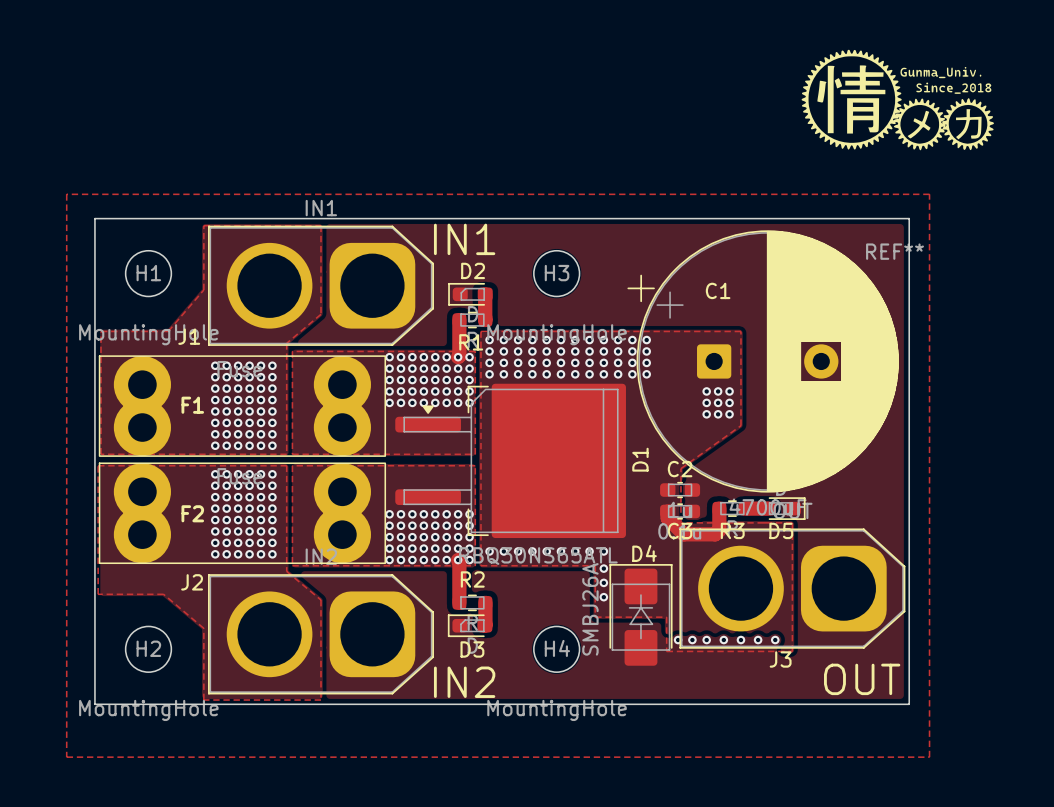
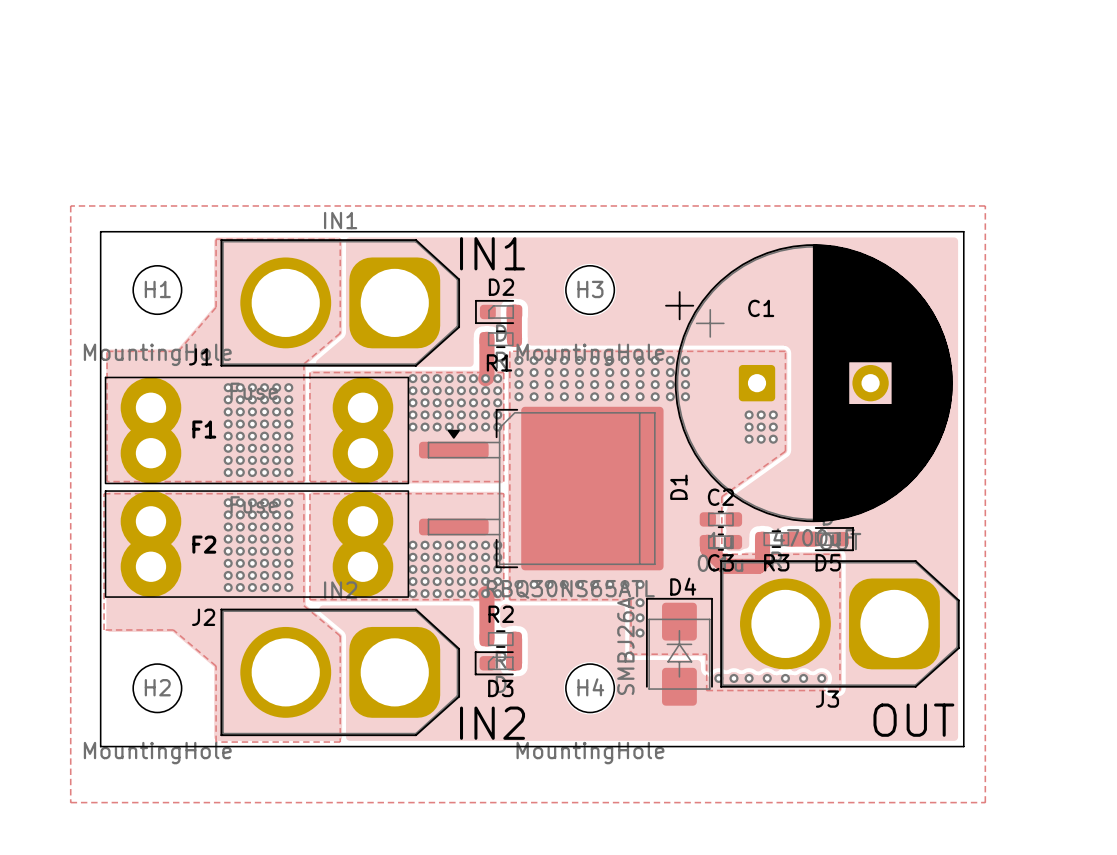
REF**: (897, 100) -> none

